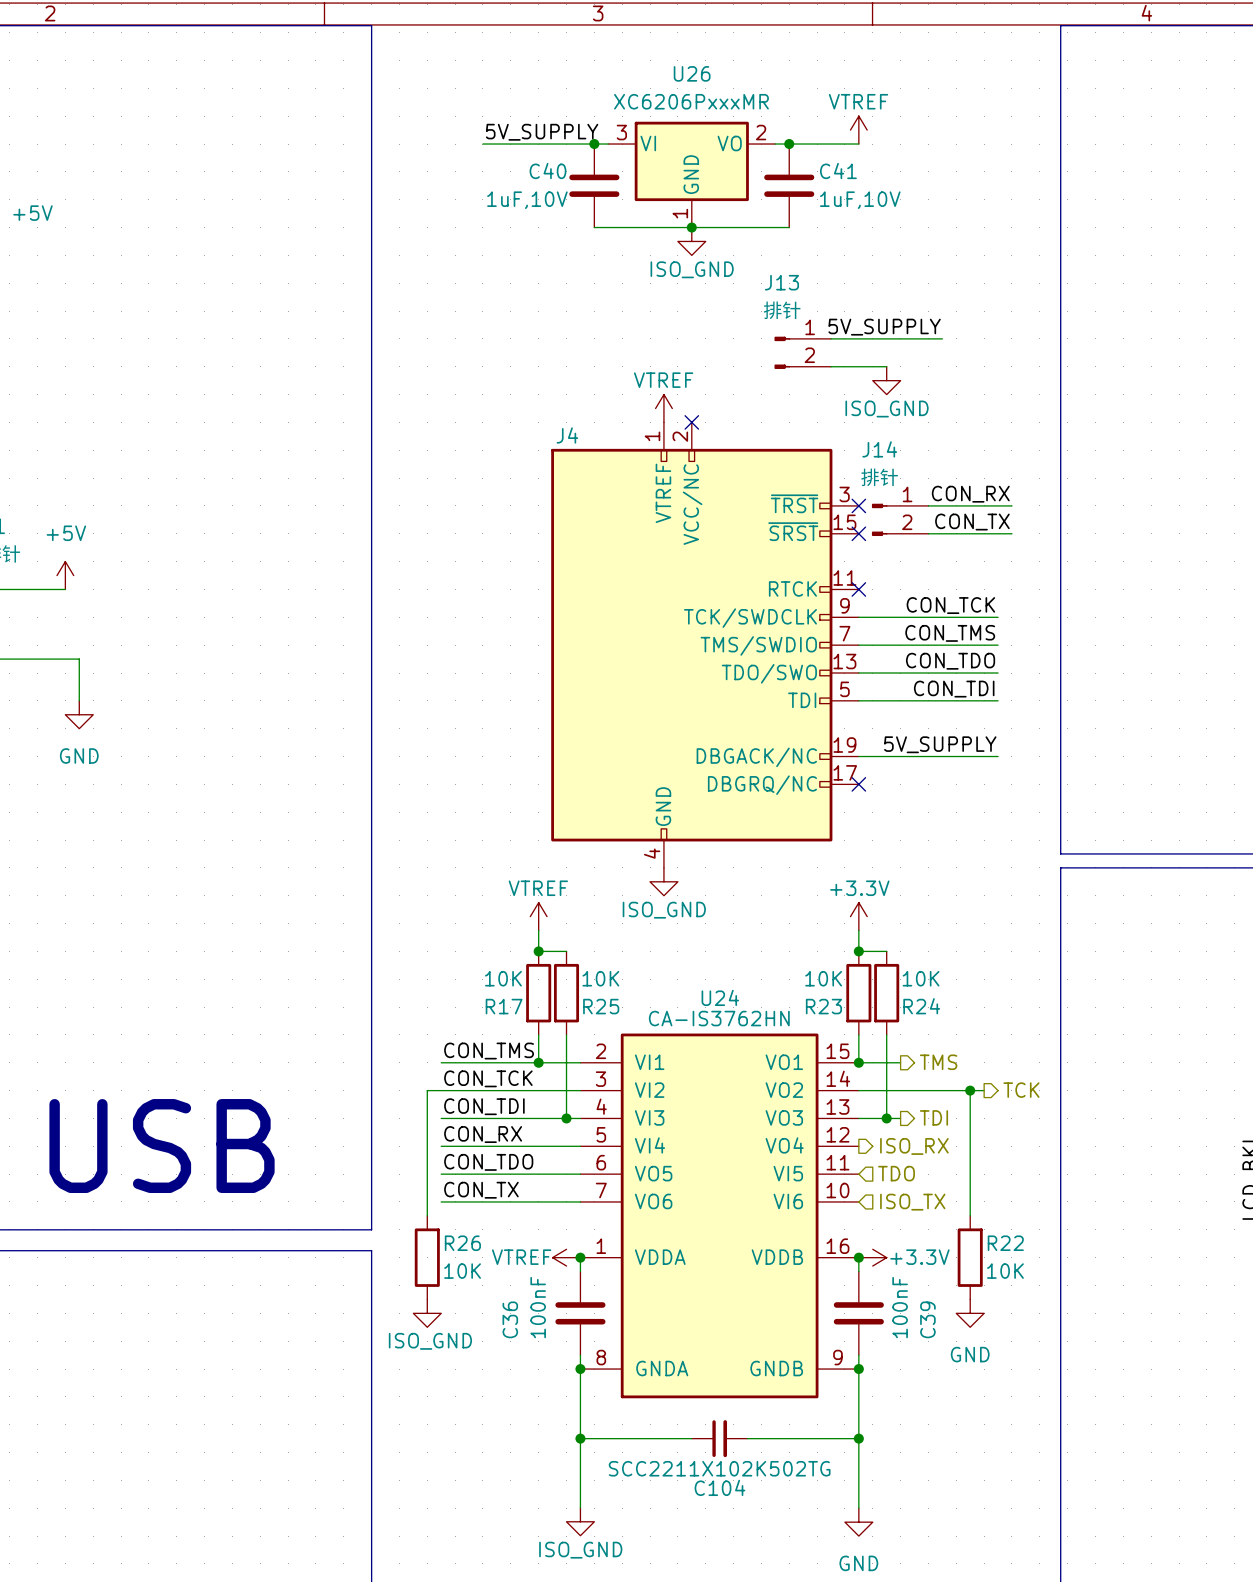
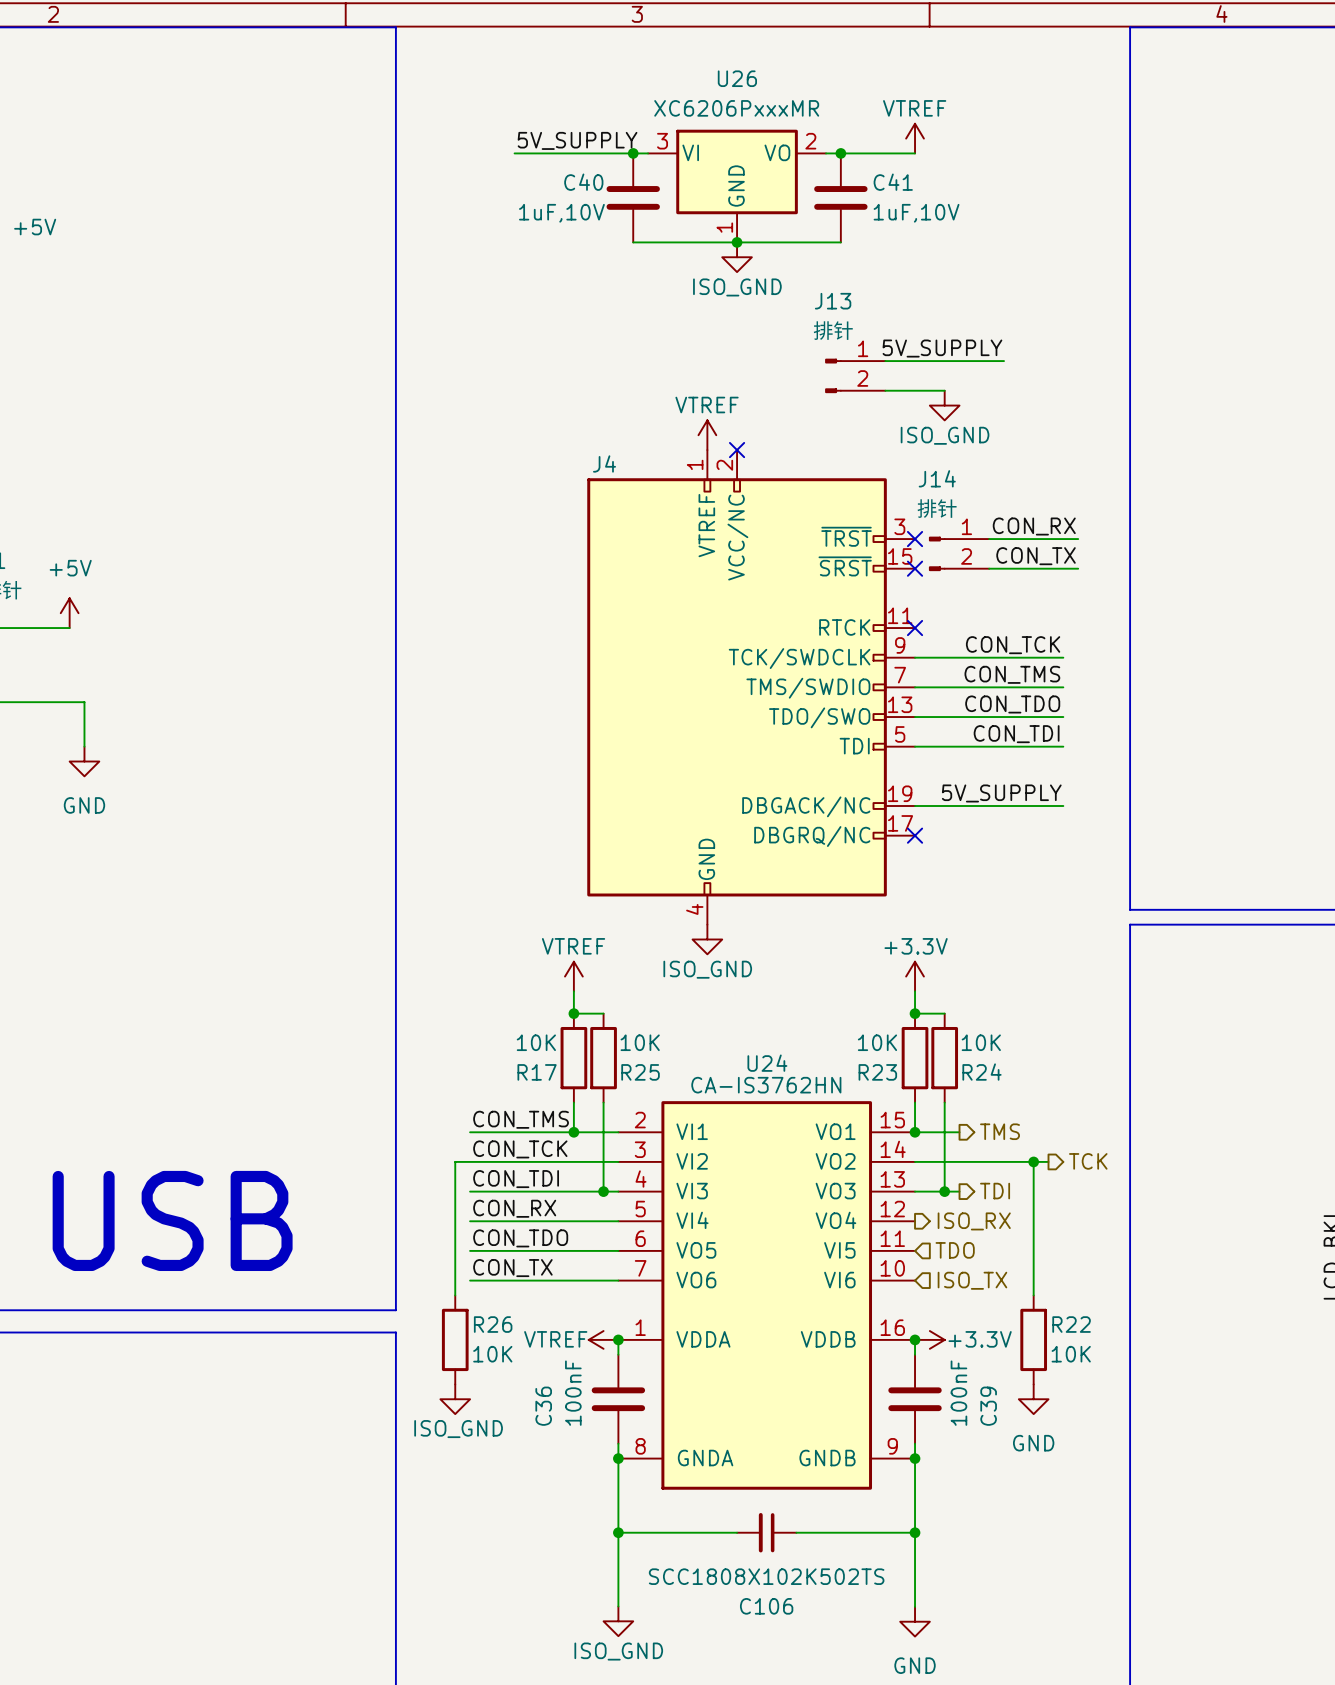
C104: SCC2211X102K502TG (719, 1438) -> none
C106: none -> SCC1808X102K502TS (766, 1532)

